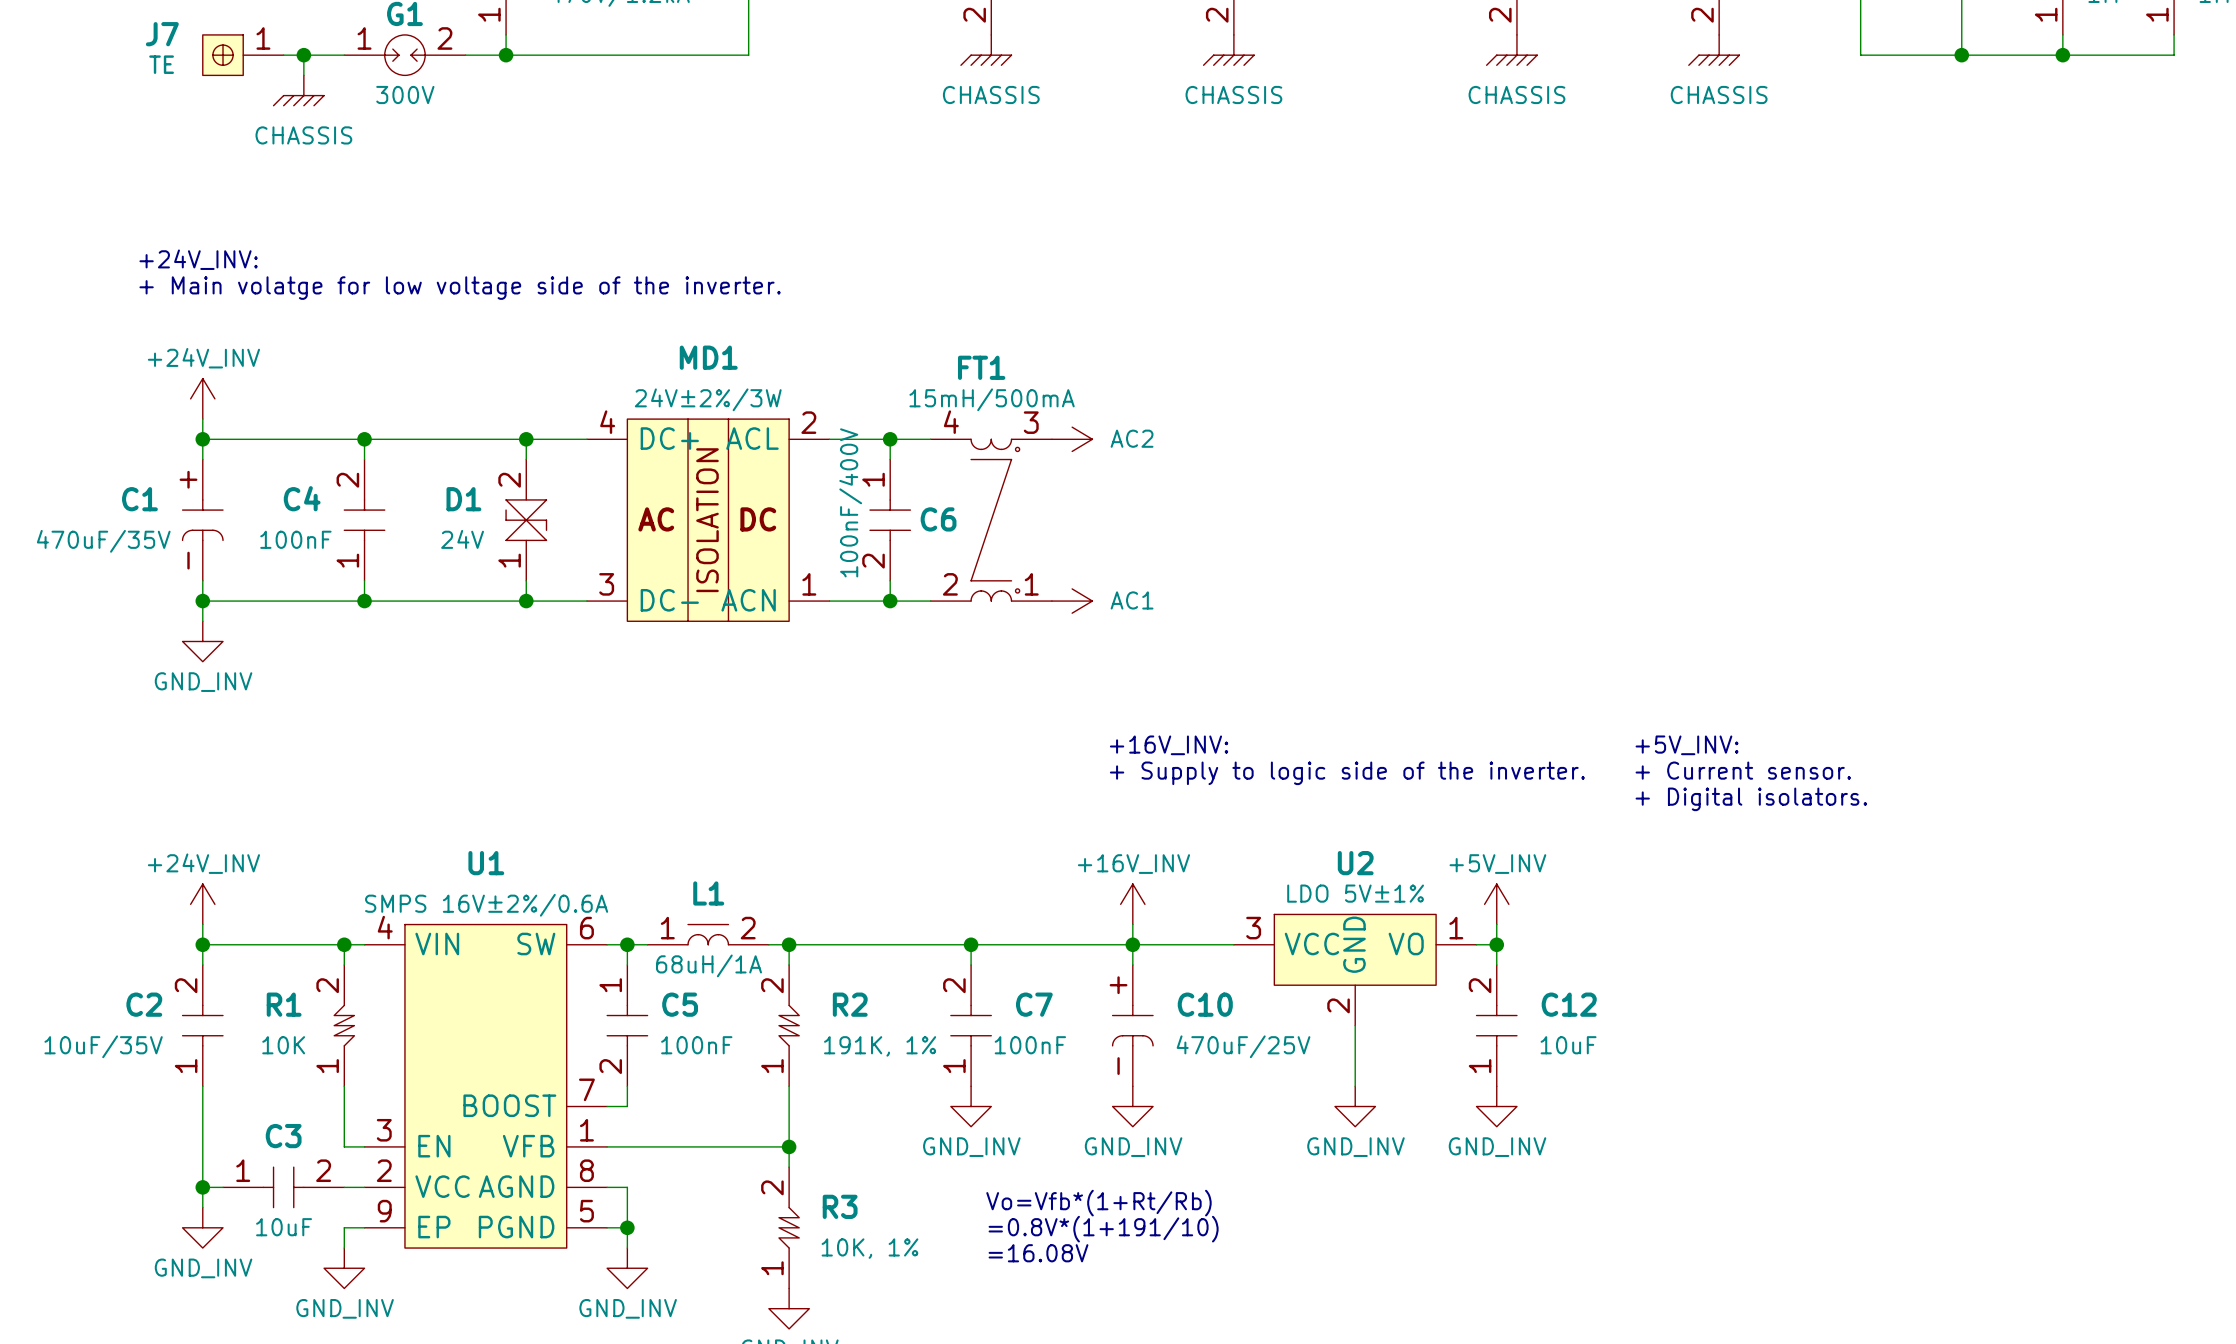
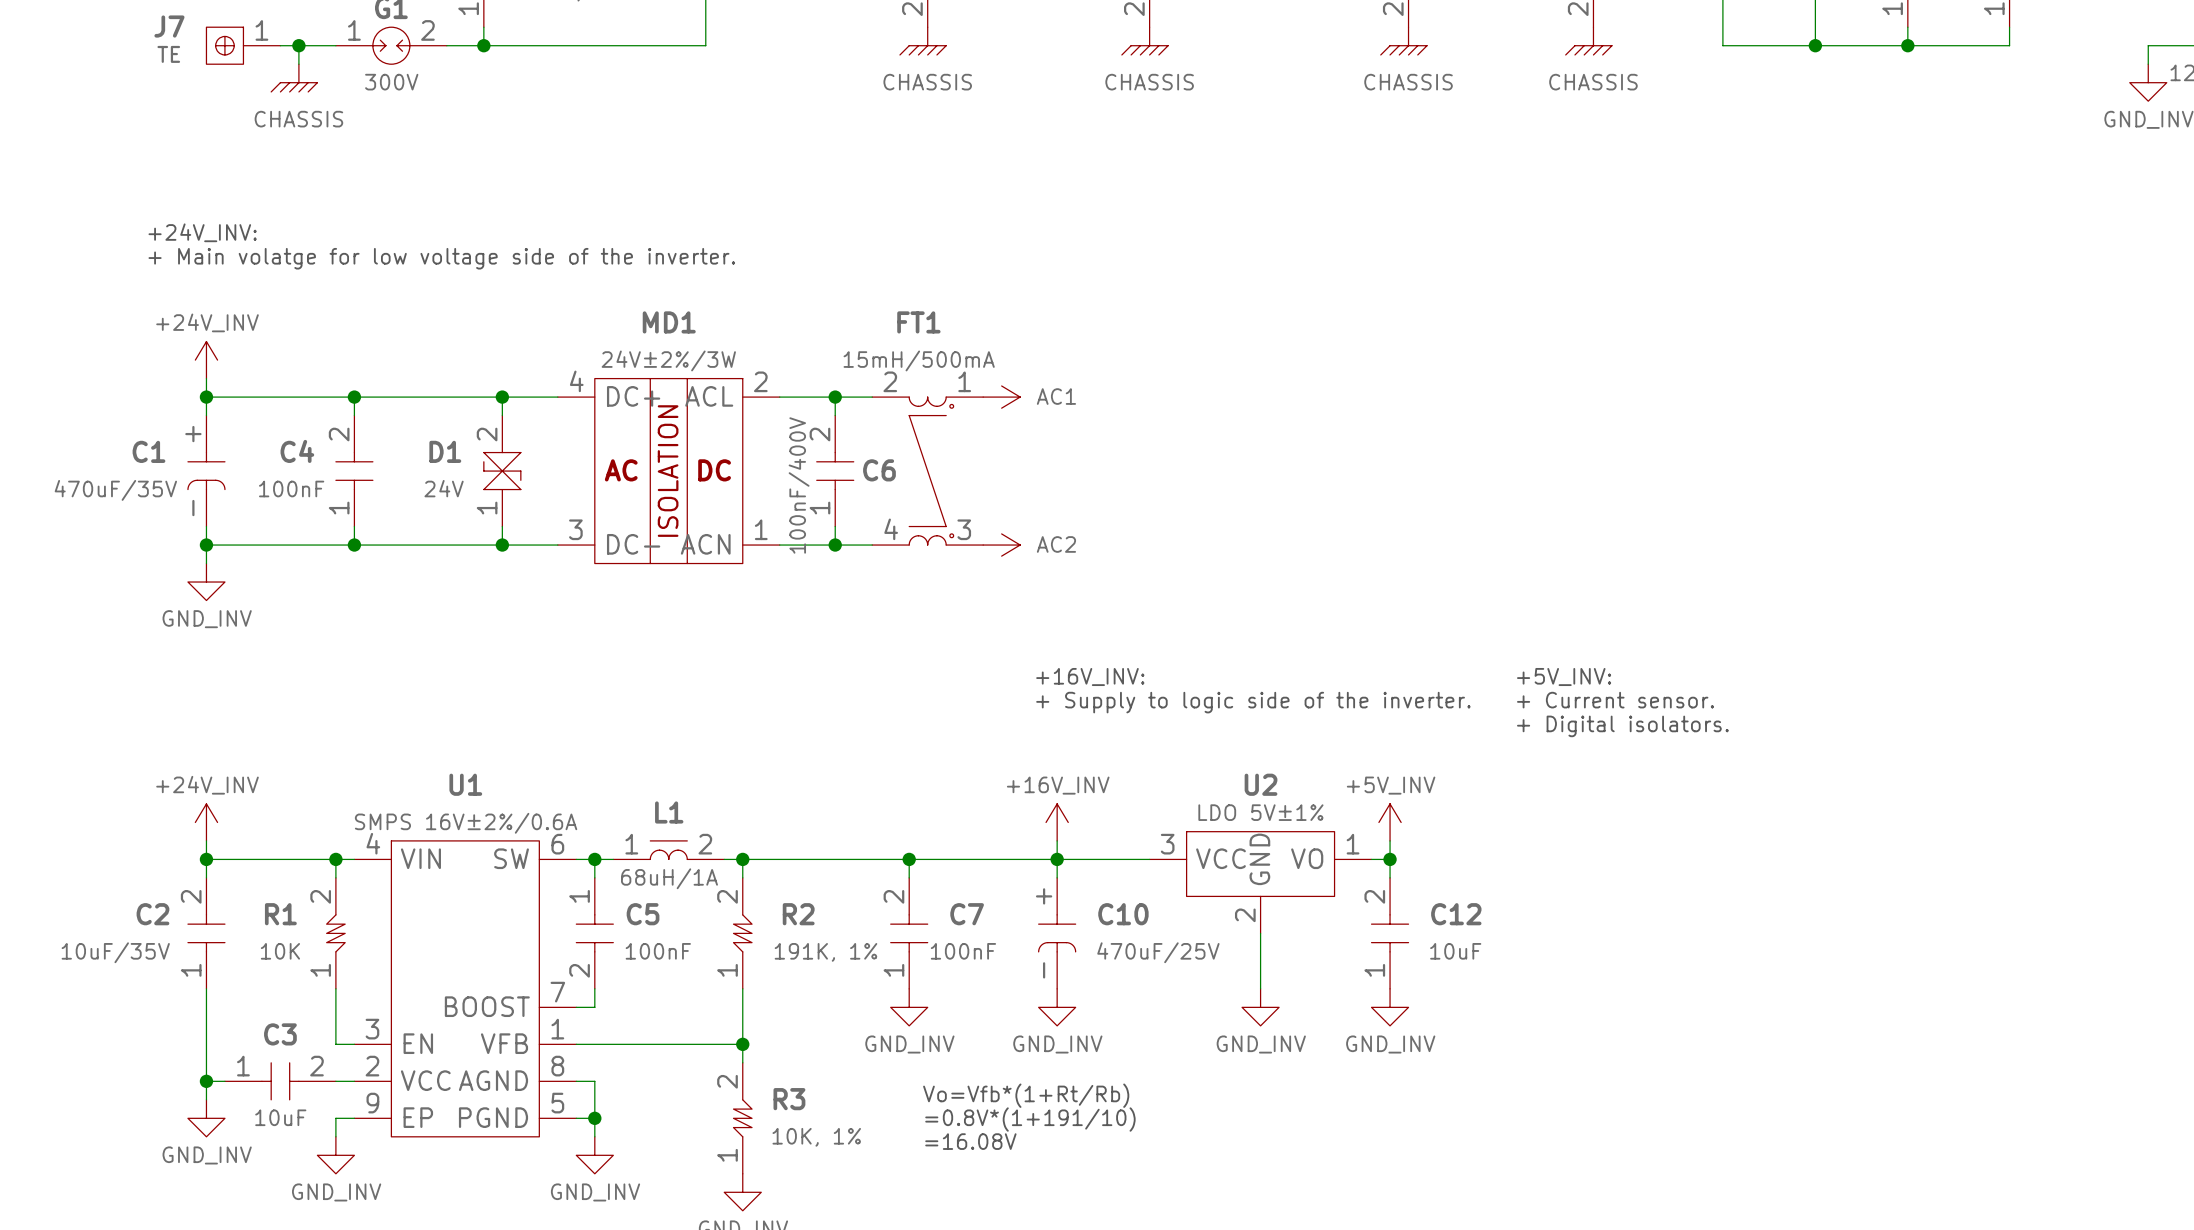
power symbol: AC2 (1072, 439) -> AC1 (1001, 397)
C6 value position: 100nF/400V (850, 502) -> 100nF/400V (799, 485)
C6 rotation: 0° (890, 520) -> 180° (835, 471)
FT1 flip: as is (995, 520) -> up-down (931, 471)
power symbol: AC1 (1072, 601) -> AC2 (1001, 545)

